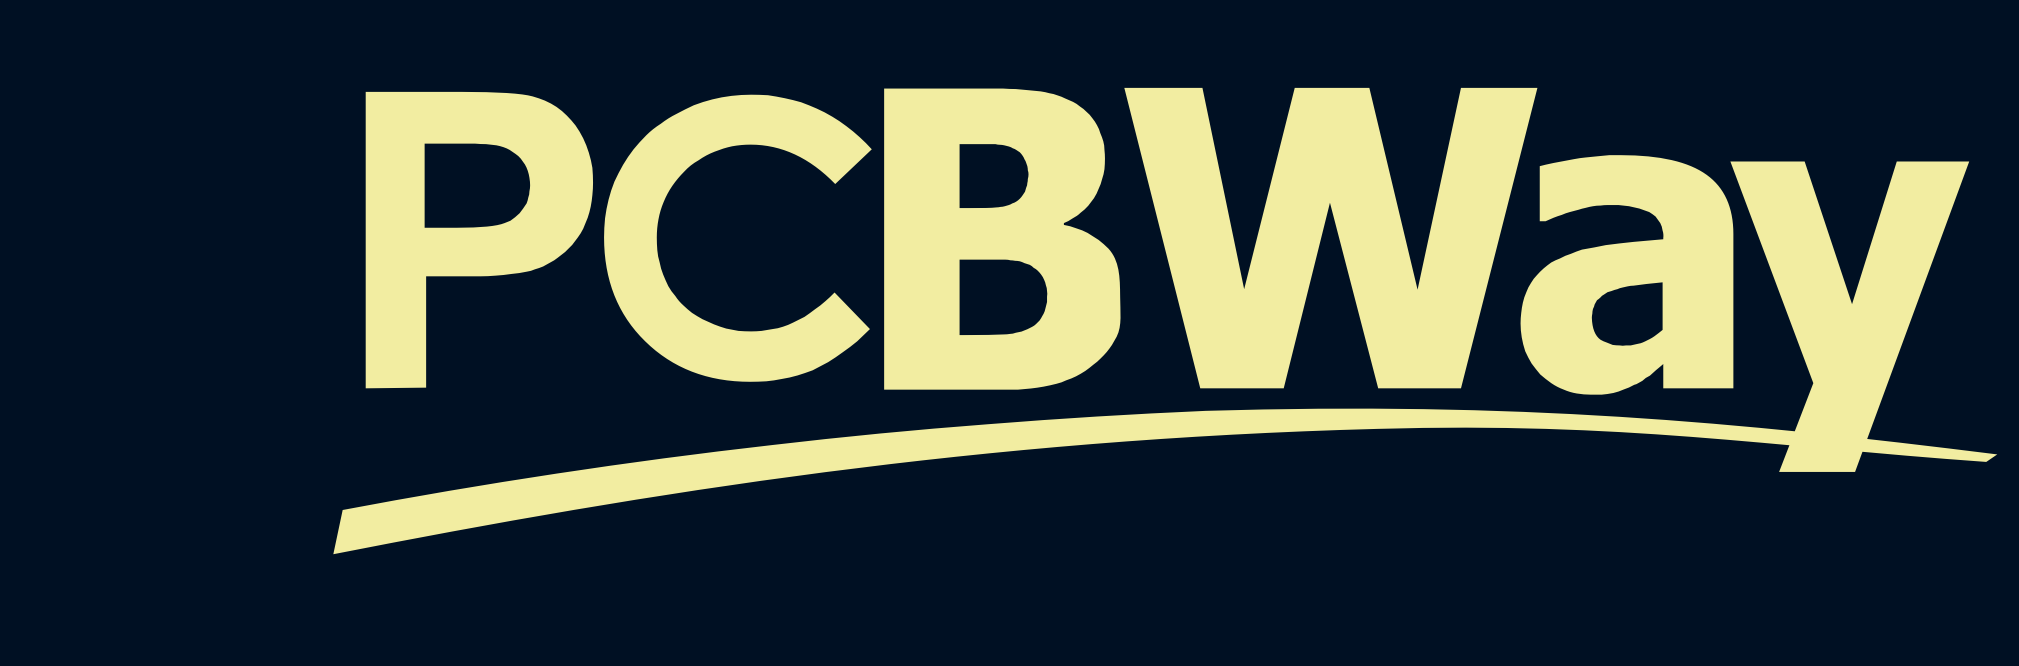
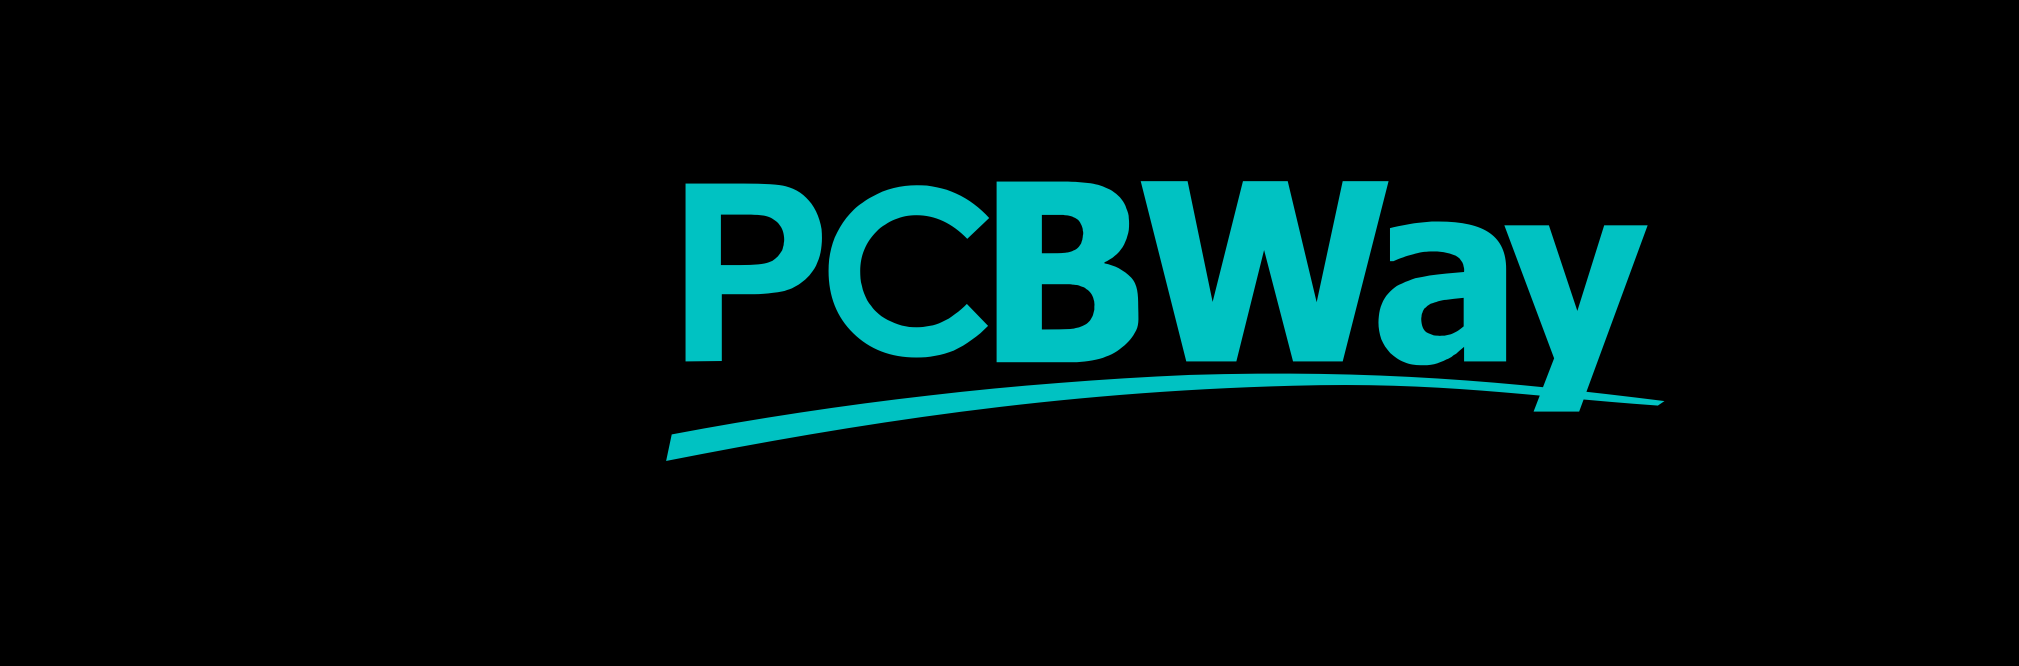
drawing shape: [333, 87, 1998, 555] -> [666, 181, 1665, 461]

